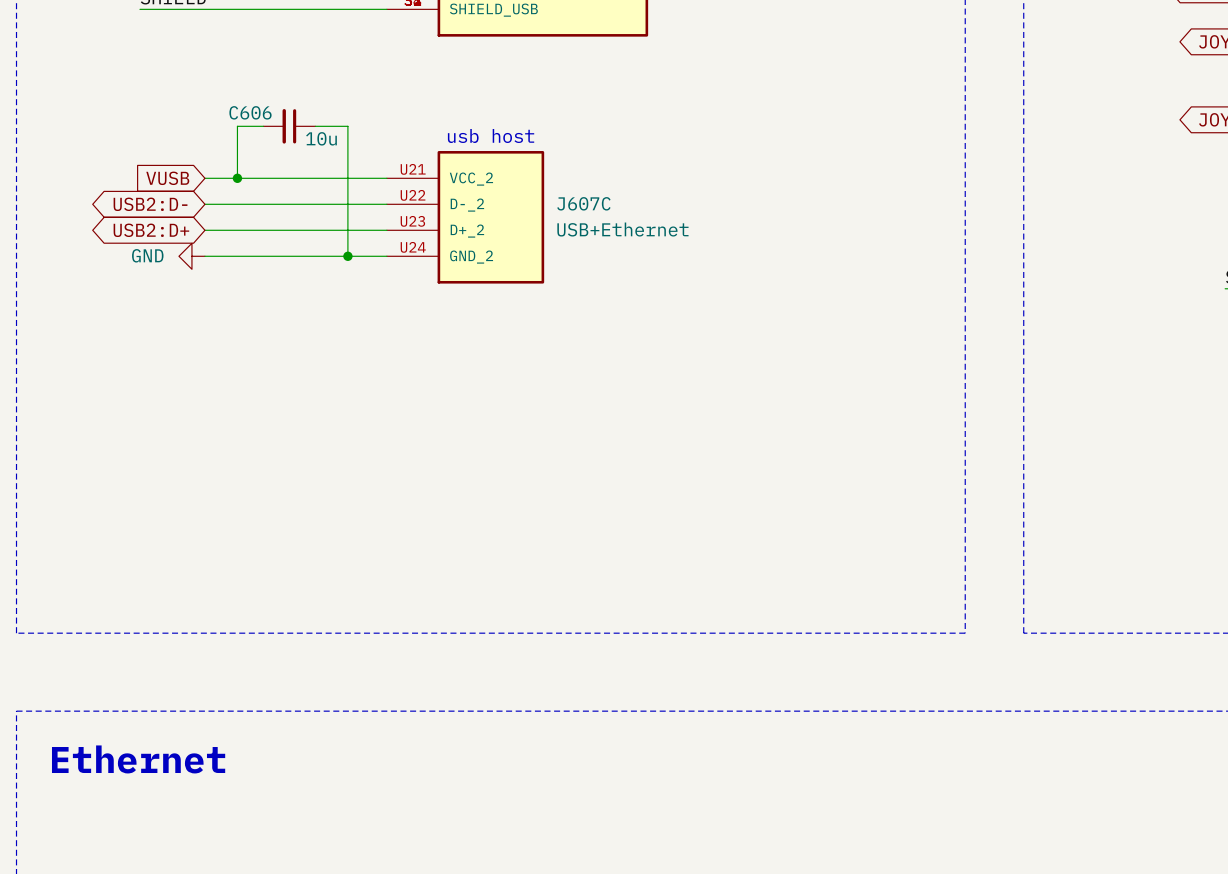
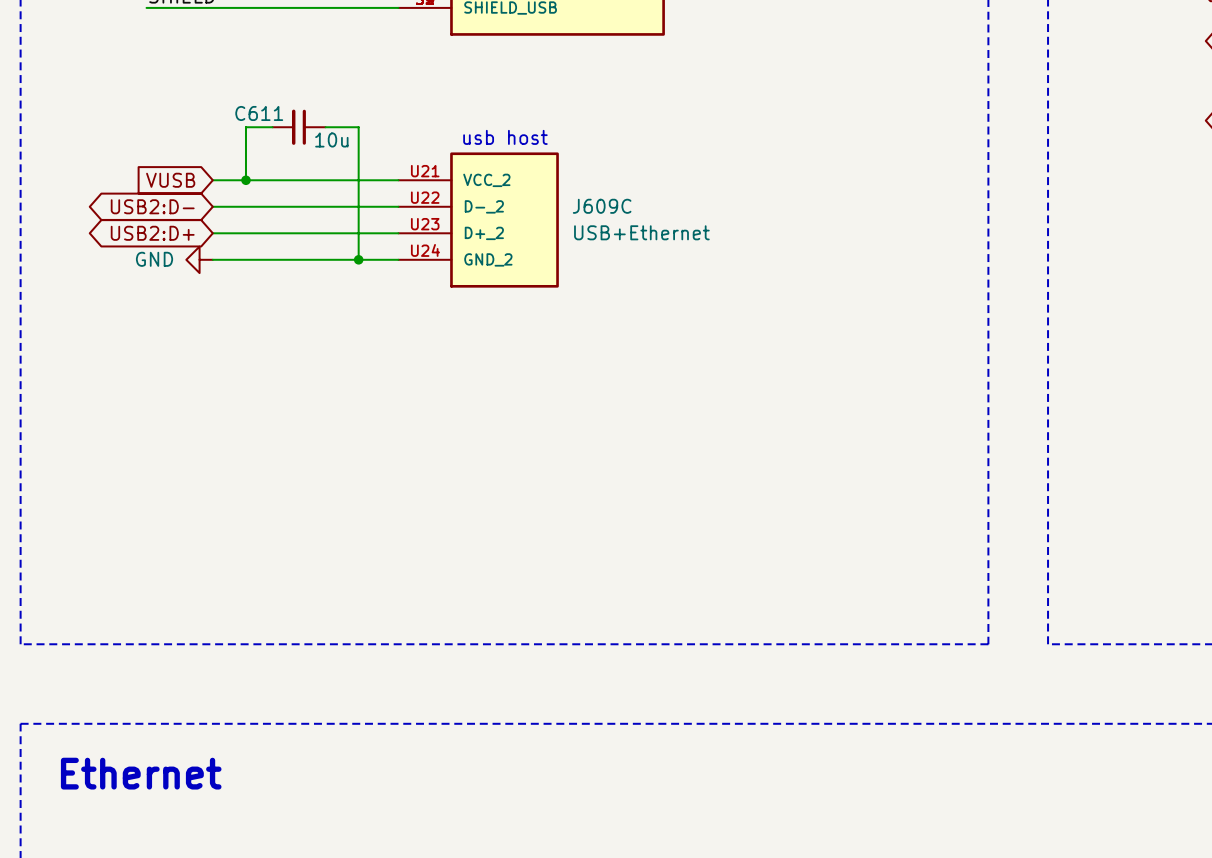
C606 name: C606 (250, 112) -> C611 (259, 113)
J607C name: J607C (583, 203) -> J609C (602, 206)

